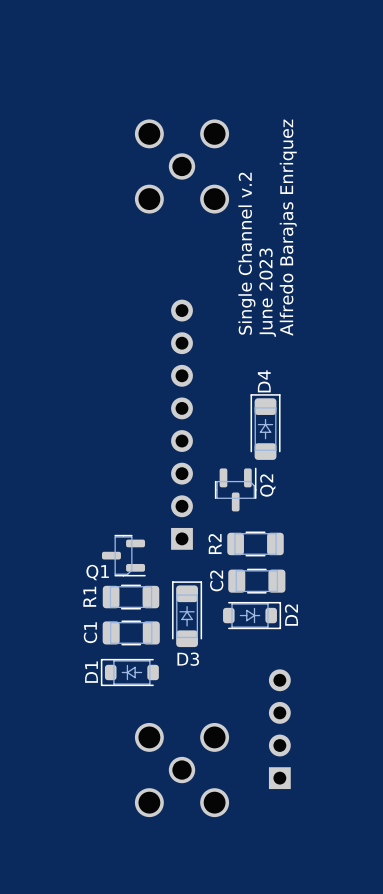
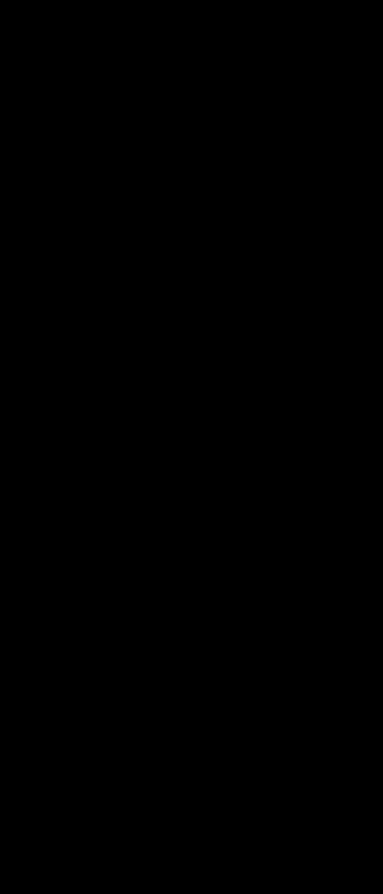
part: (182, 166) -> none
text: Alfredo Barajas Enriquez (288, 227) -> none
text: Single Channel v.2 (246, 253) -> none
text: June 2023 (267, 292) -> none
part: (182, 424) -> none
D4: (265, 427) -> none
Q2: (235, 489) -> none
R2: (255, 543) -> none
Q1: (123, 555) -> none
C2: (256, 581) -> none
R1: (131, 597) -> none
D3: (187, 614) -> none
D2: (252, 615) -> none
C1: (131, 632) -> none
D1: (129, 672) -> none
part: (279, 729) -> none
part: (182, 770) -> none

